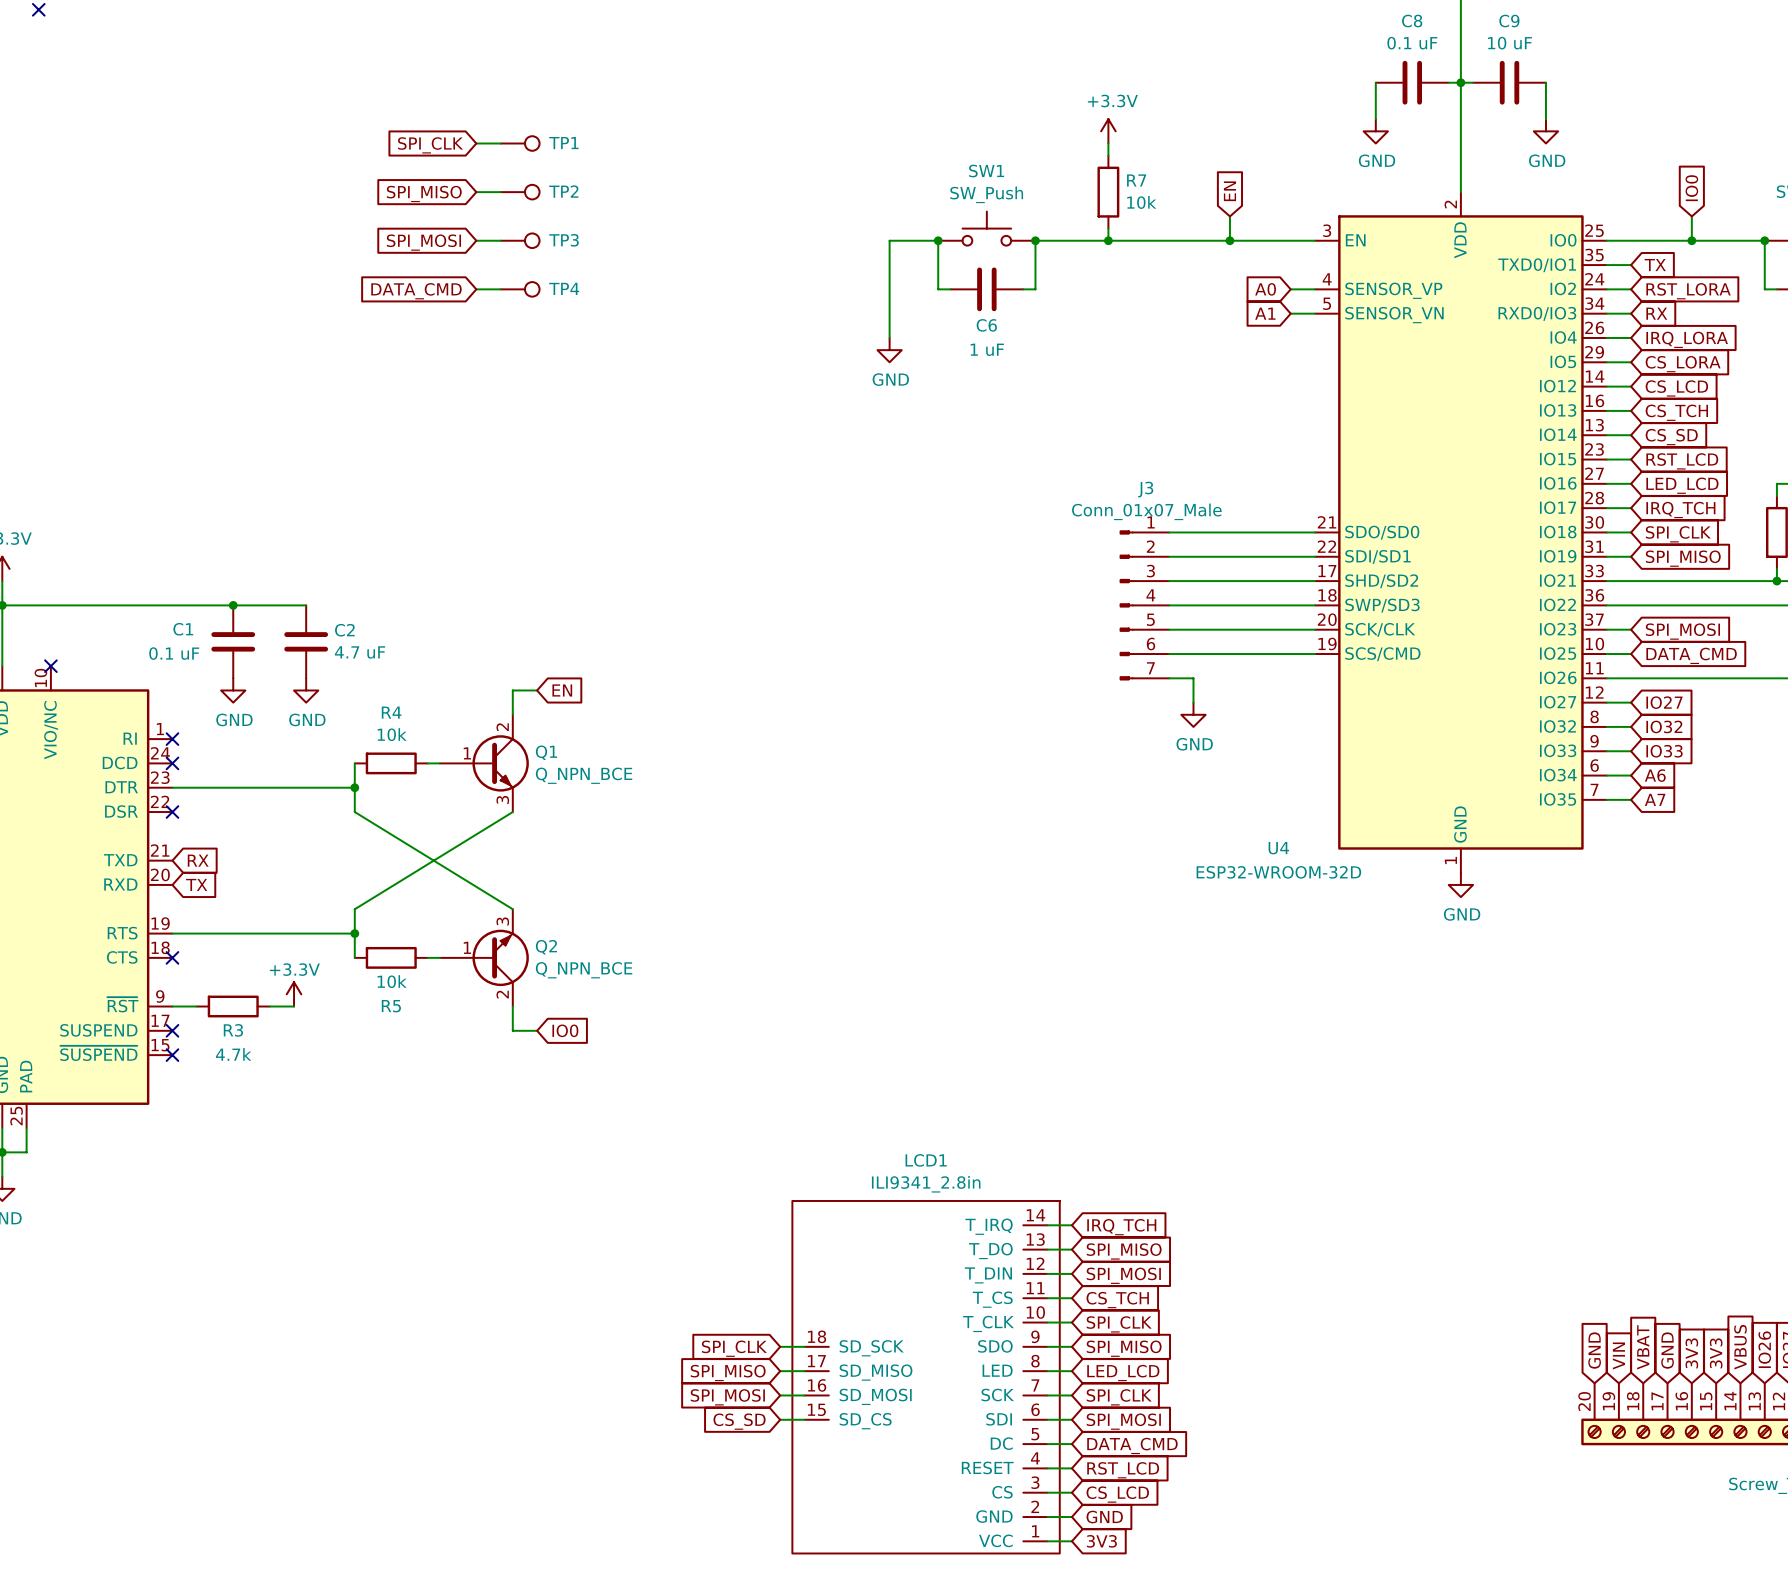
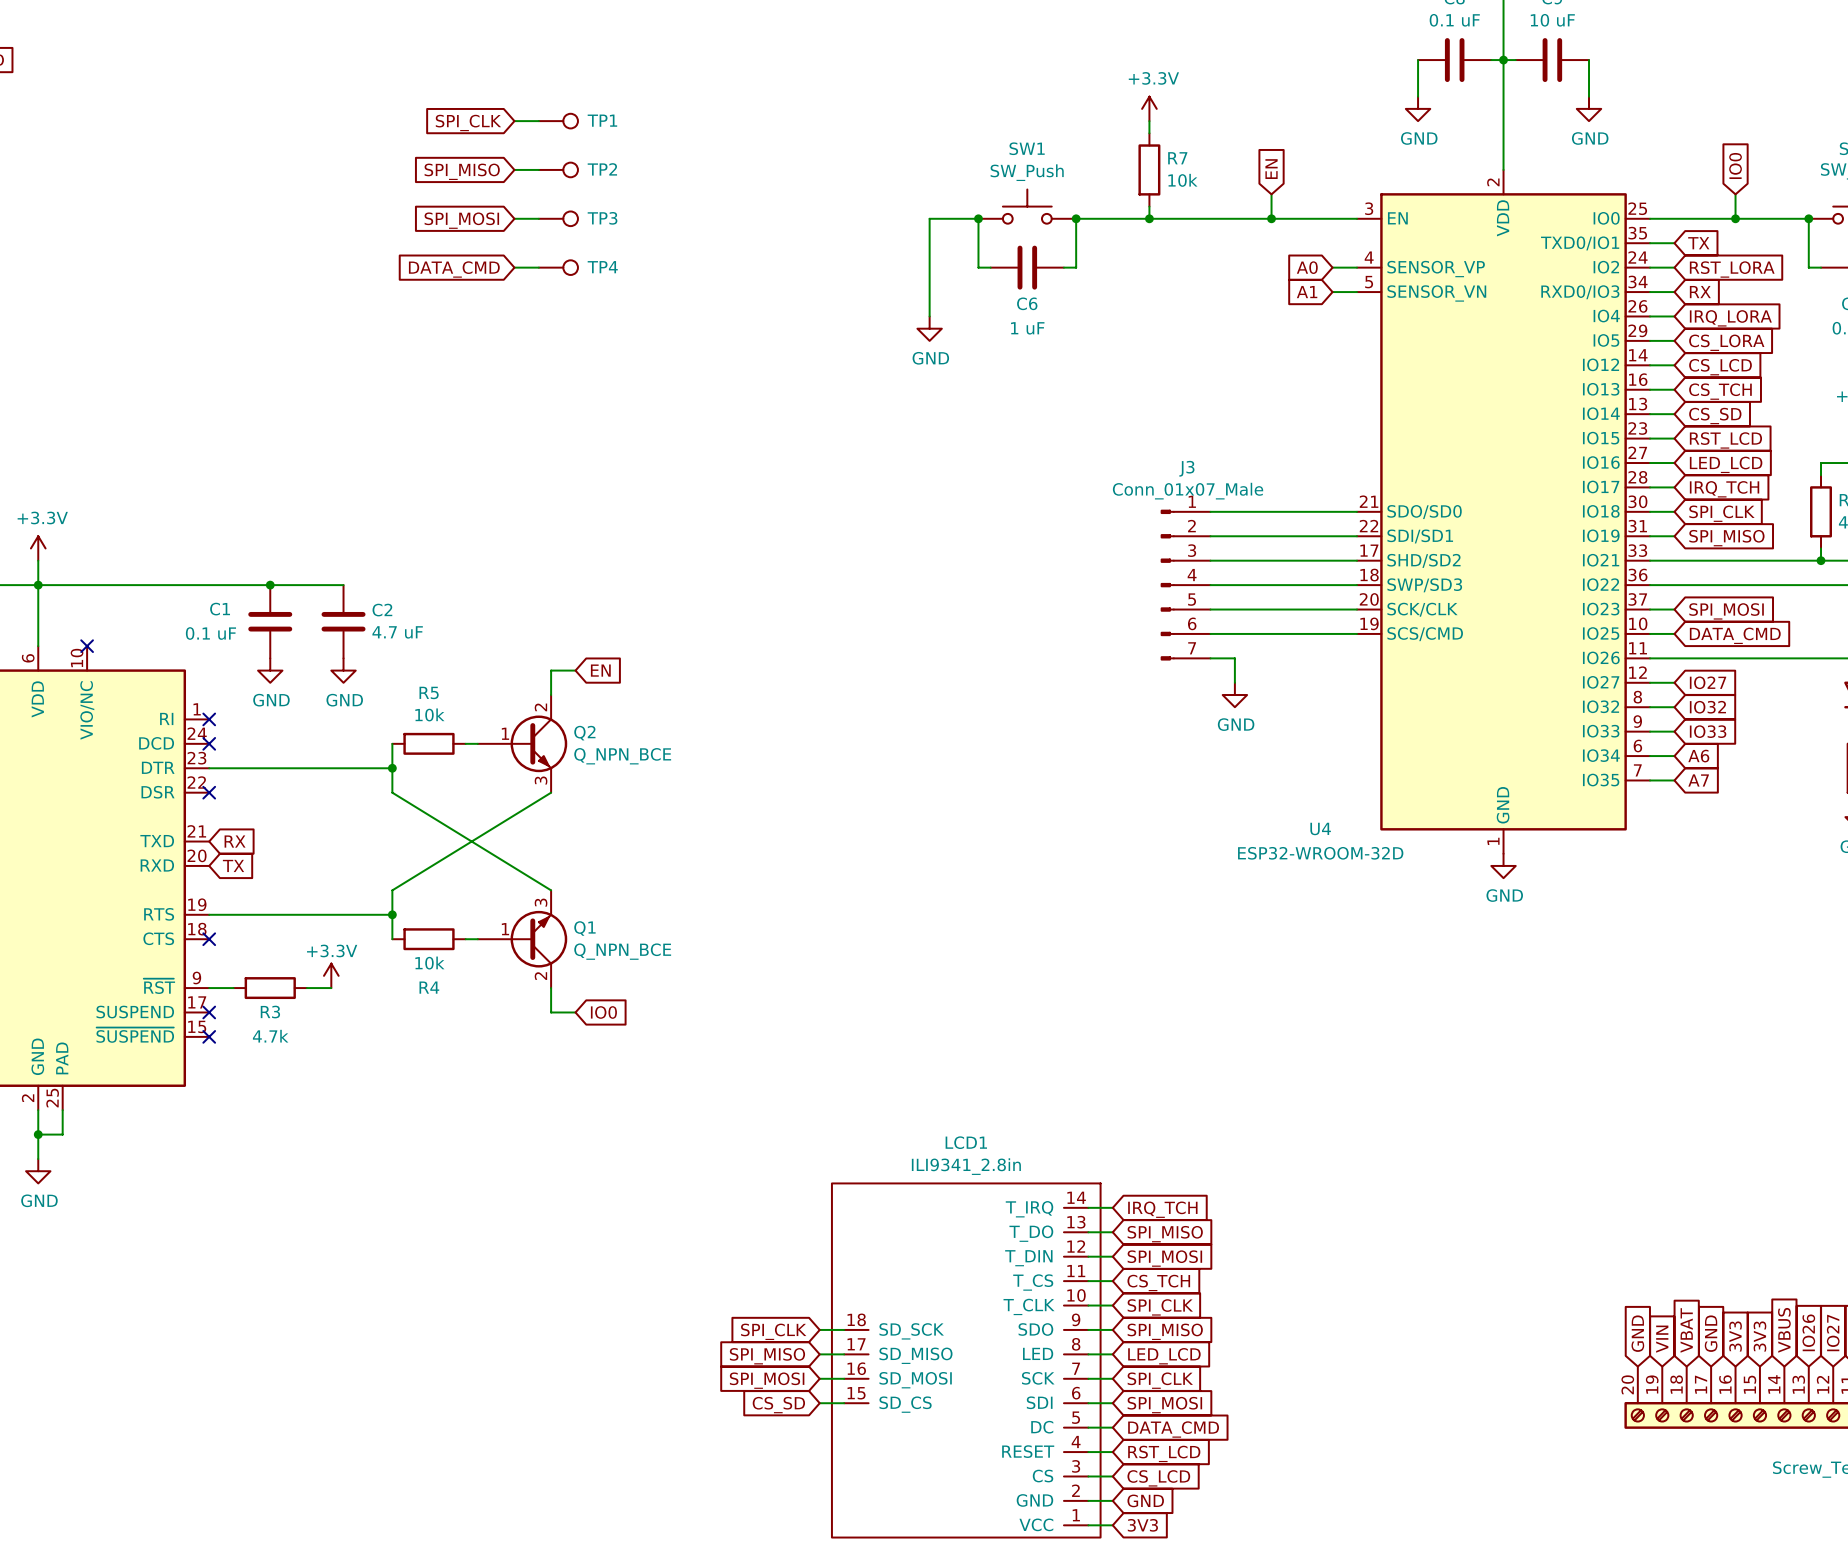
R4 name: R4 (391, 712) -> R5 (429, 692)
Q1 name: Q1 (546, 752) -> Q2 (584, 733)
Q2 name: Q2 (546, 947) -> Q1 (584, 928)
R5 name: R5 (391, 1006) -> R4 (429, 987)

